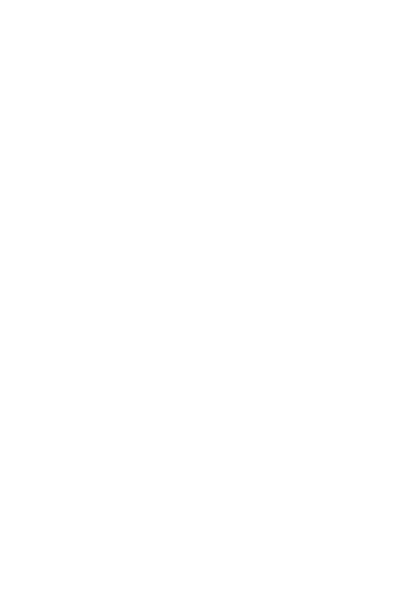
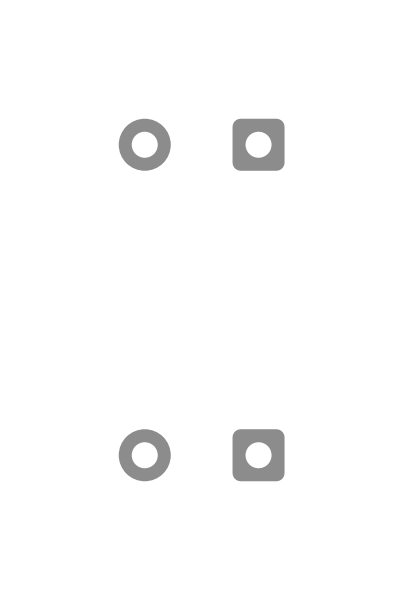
part: none -> (201, 144)
part: none -> (201, 455)

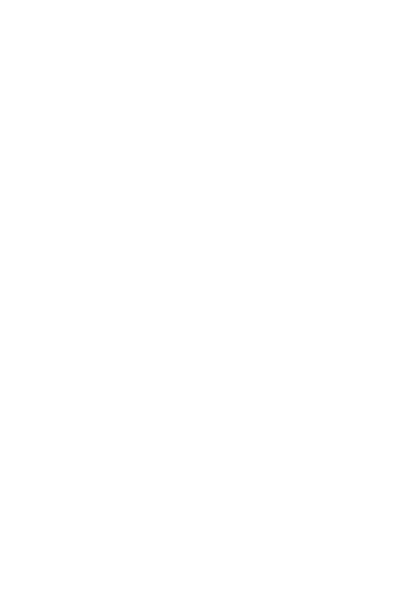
part: (201, 144) -> none
part: (201, 455) -> none

